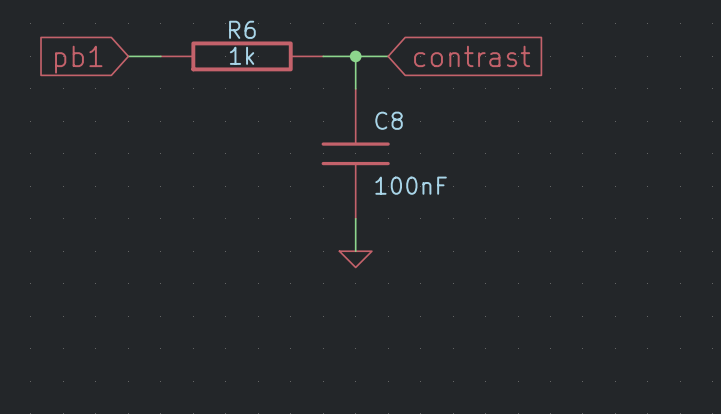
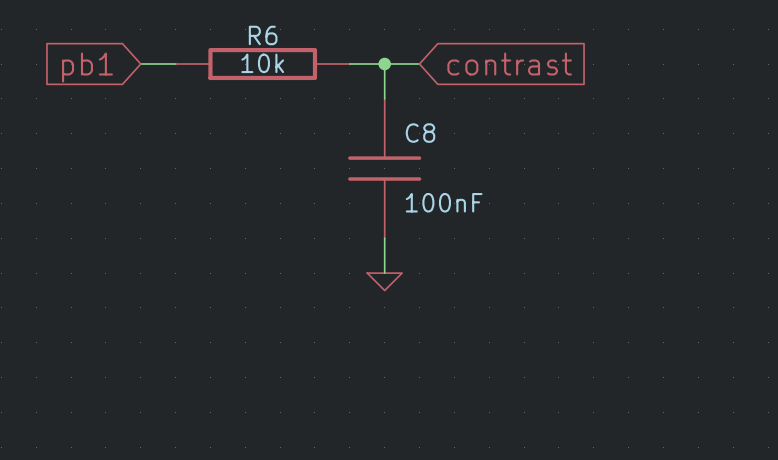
R6 value: 1k (242, 55) -> 10k (262, 63)

